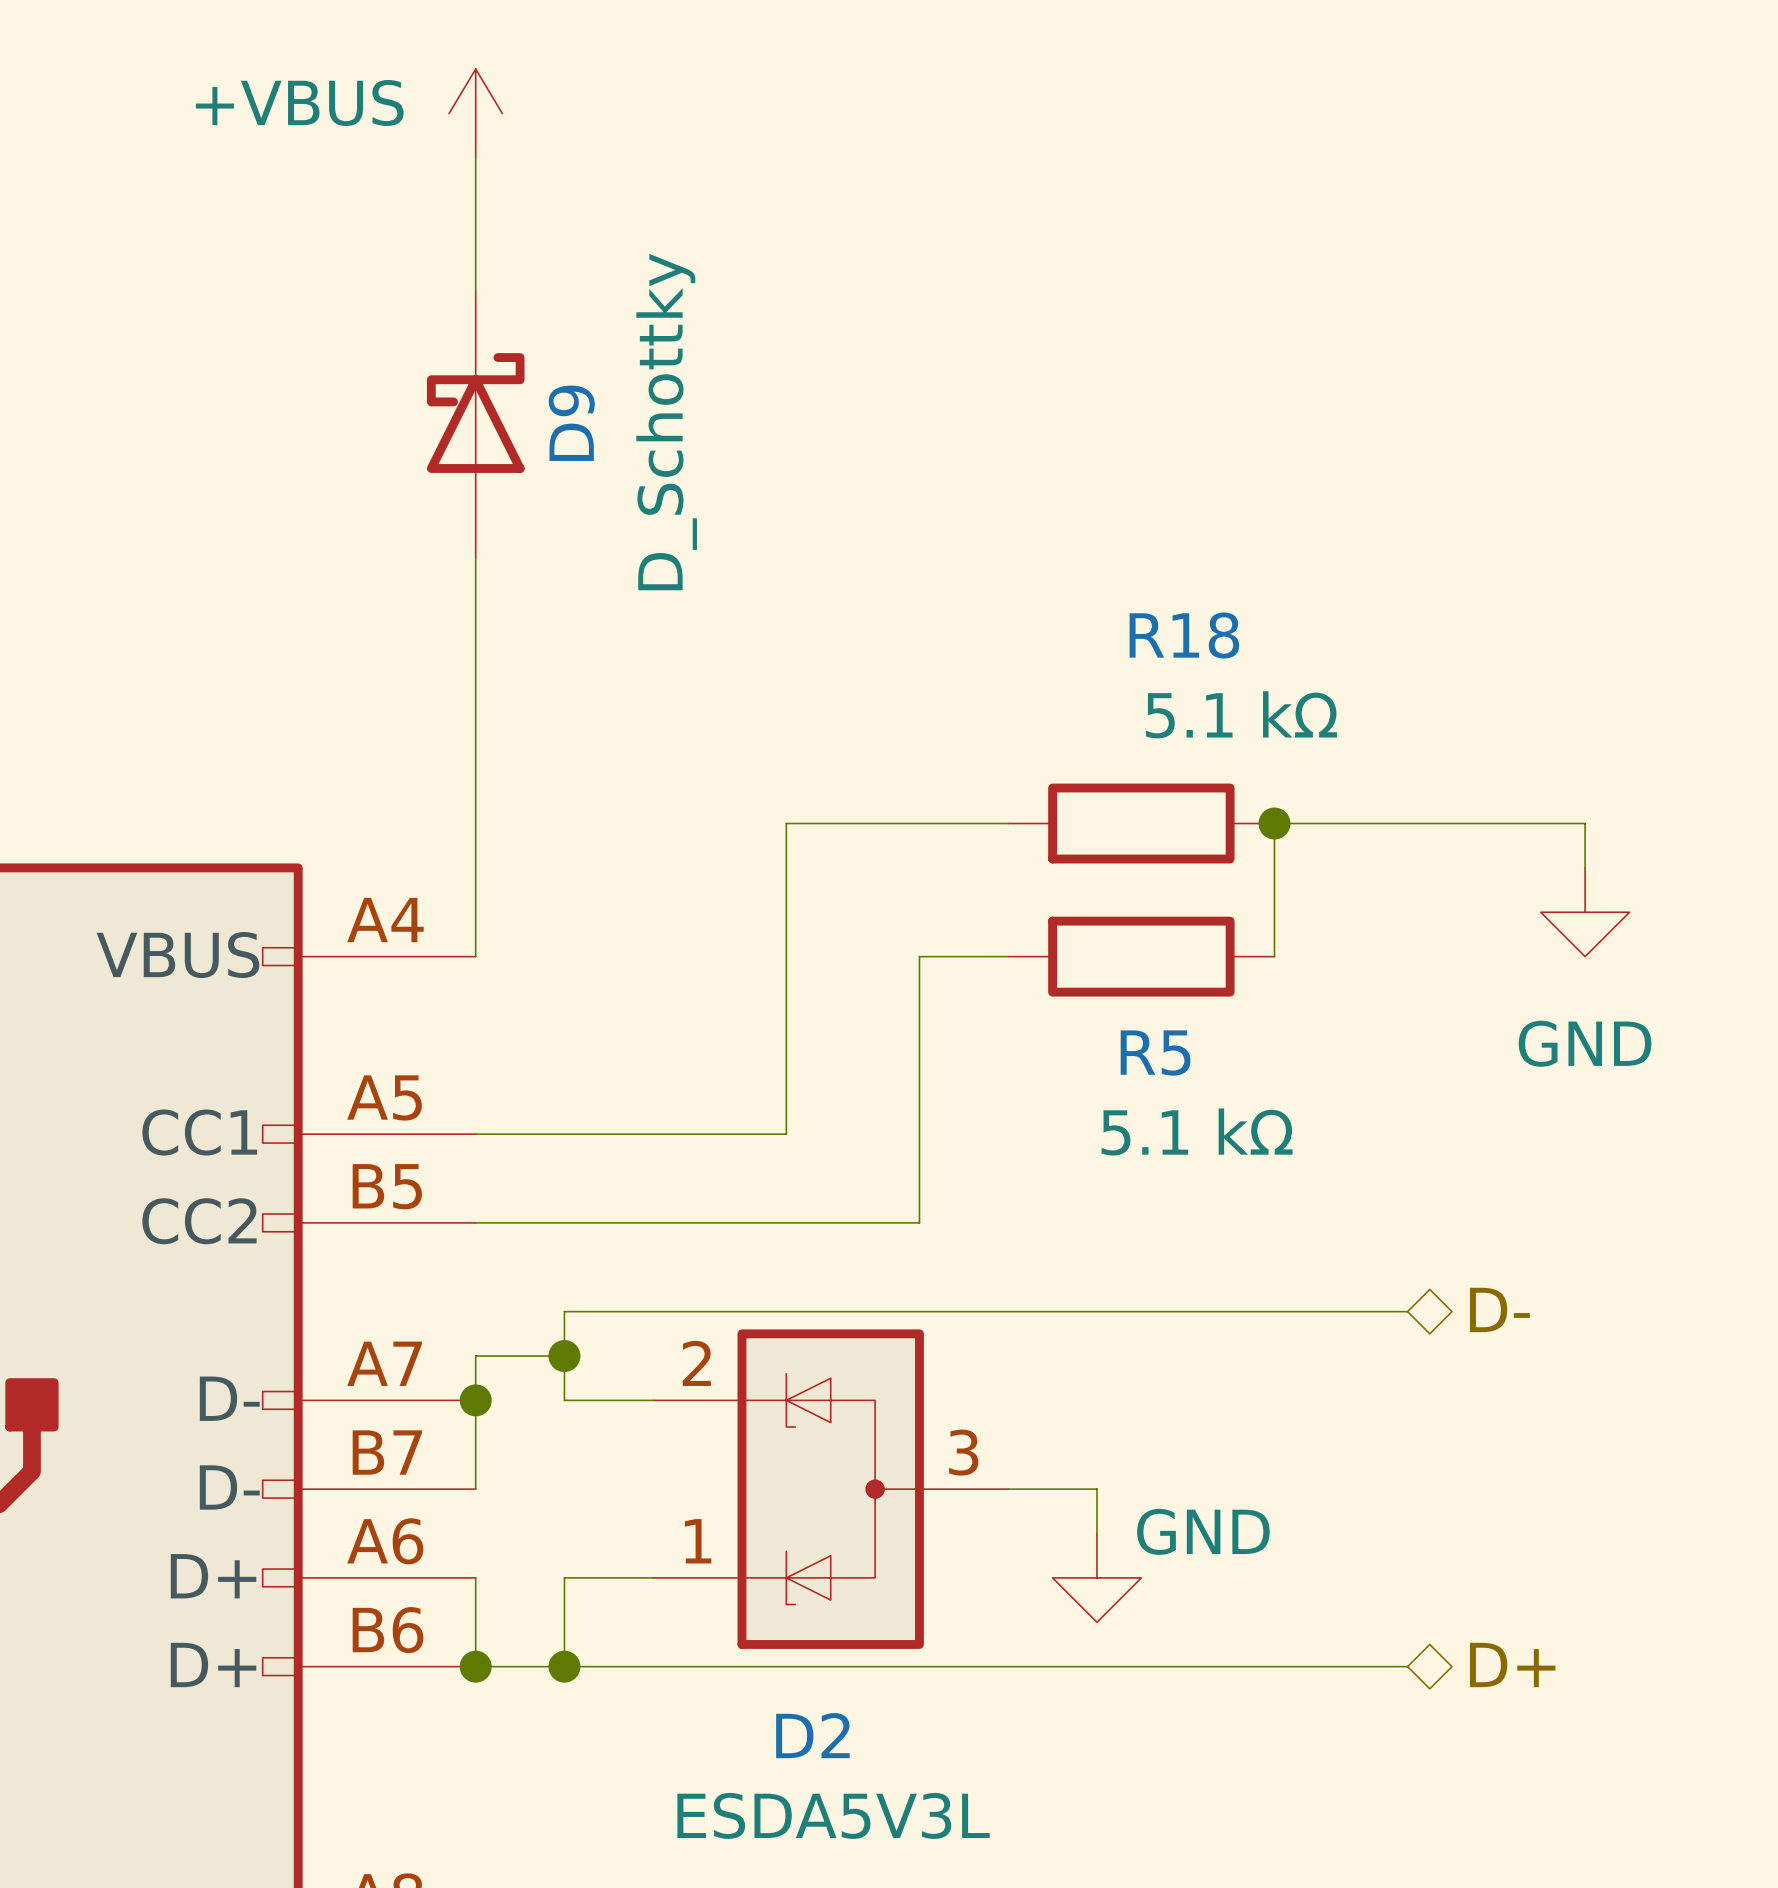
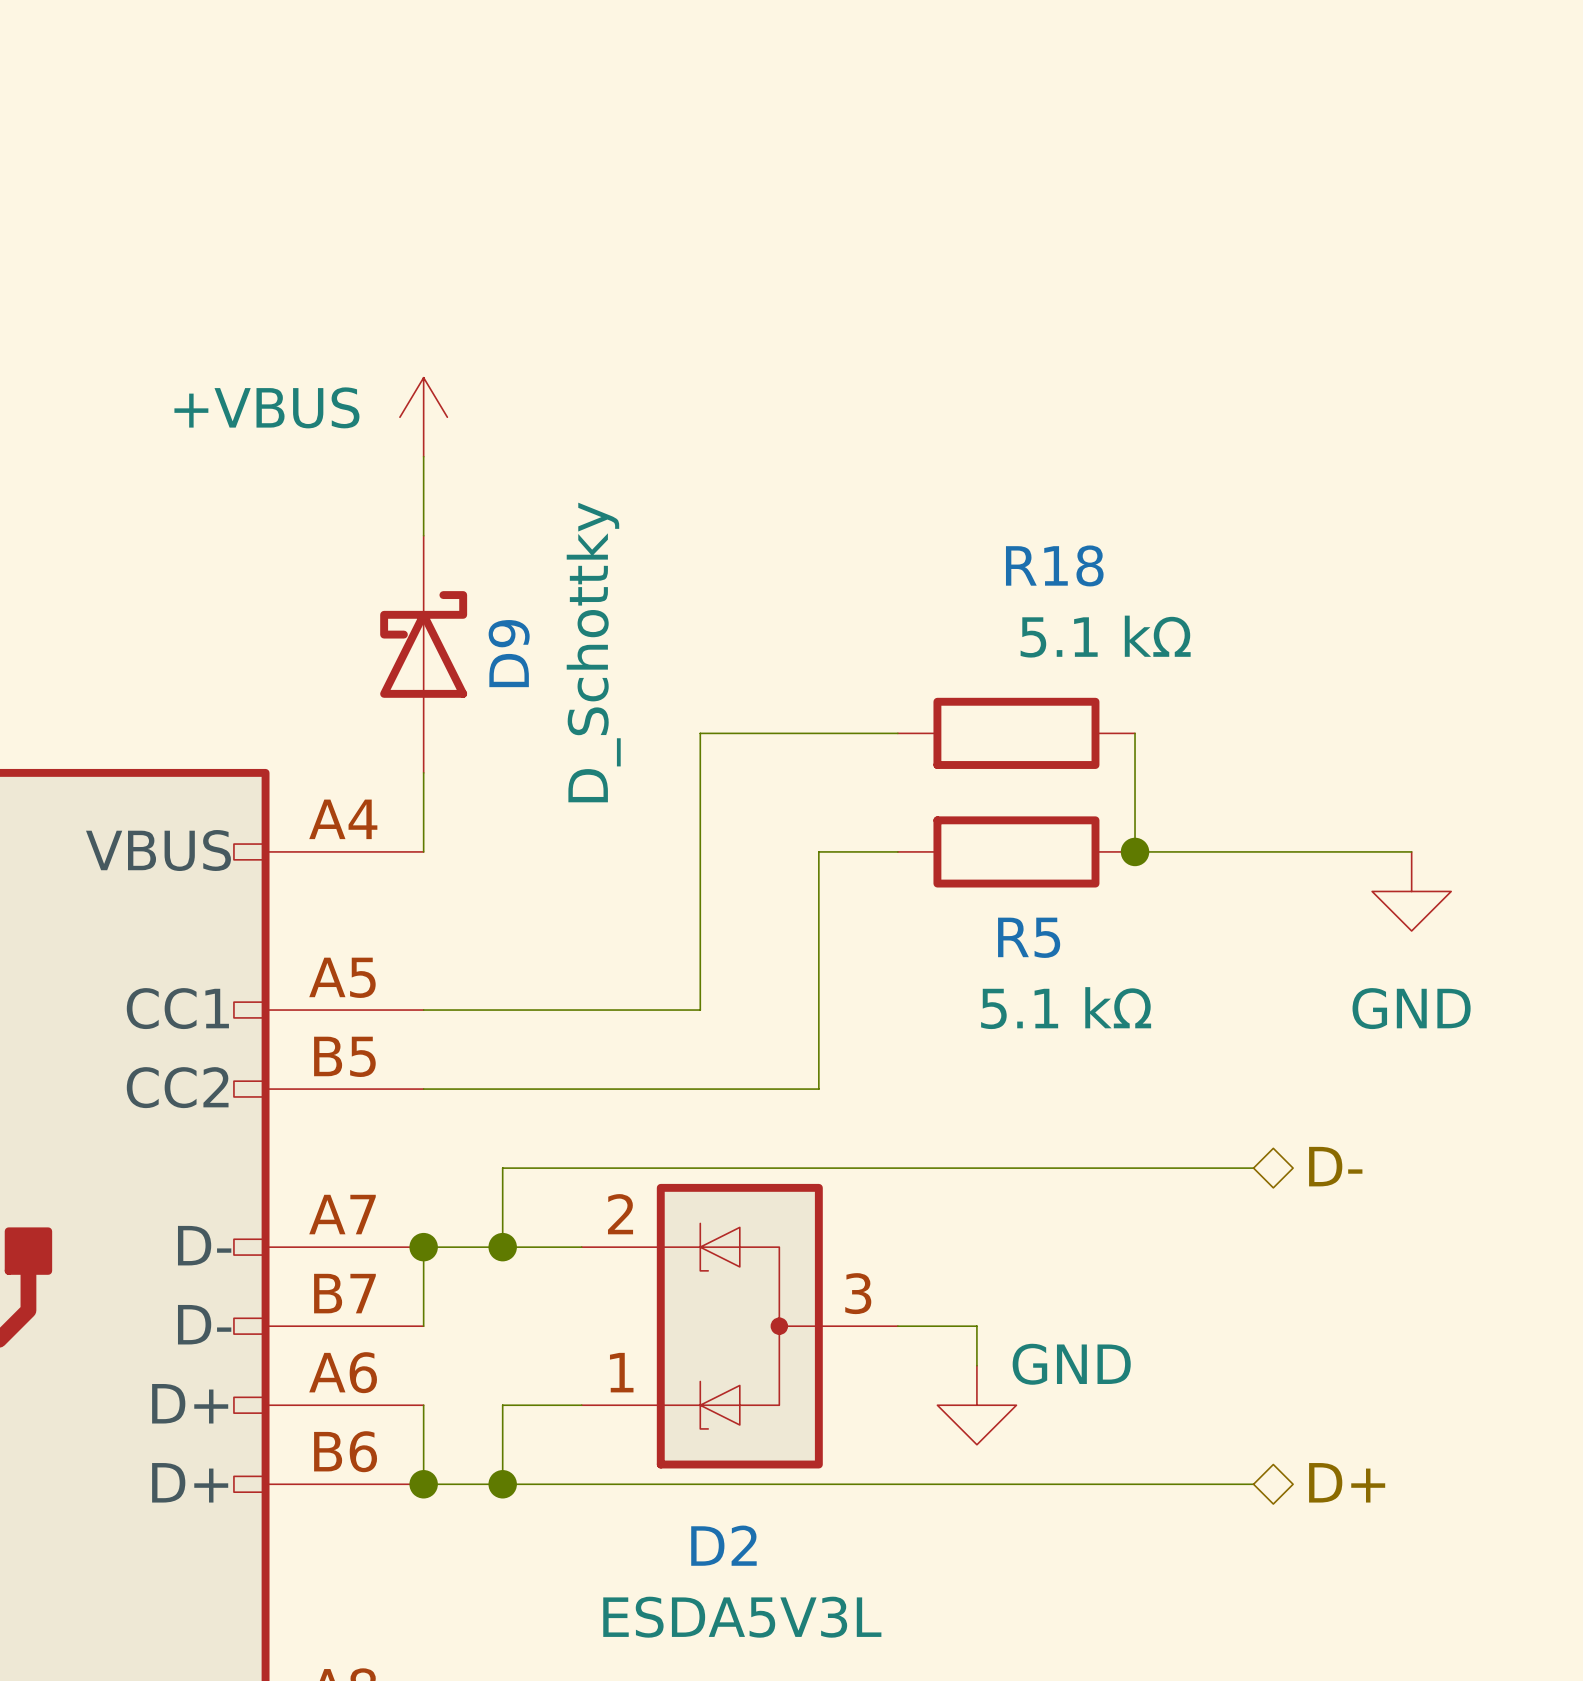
power symbol position: +VBUS (475, 113) -> +VBUS (423, 417)
wire: (475, 157) (475, 290) -> none
D9 position: (475, 424) -> (423, 654)
wire: (1274, 823) (1585, 823) (1585, 867) -> none
junction position: (1274, 823) -> (1135, 851)
power symbol position: GND (1585, 912) -> GND (1411, 891)
wire: none -> (1135, 851) (1411, 851)
wire: (564, 1356) (475, 1356) (475, 1400) -> (502, 1247) (423, 1247)
junction position: (564, 1356) -> (502, 1247)

